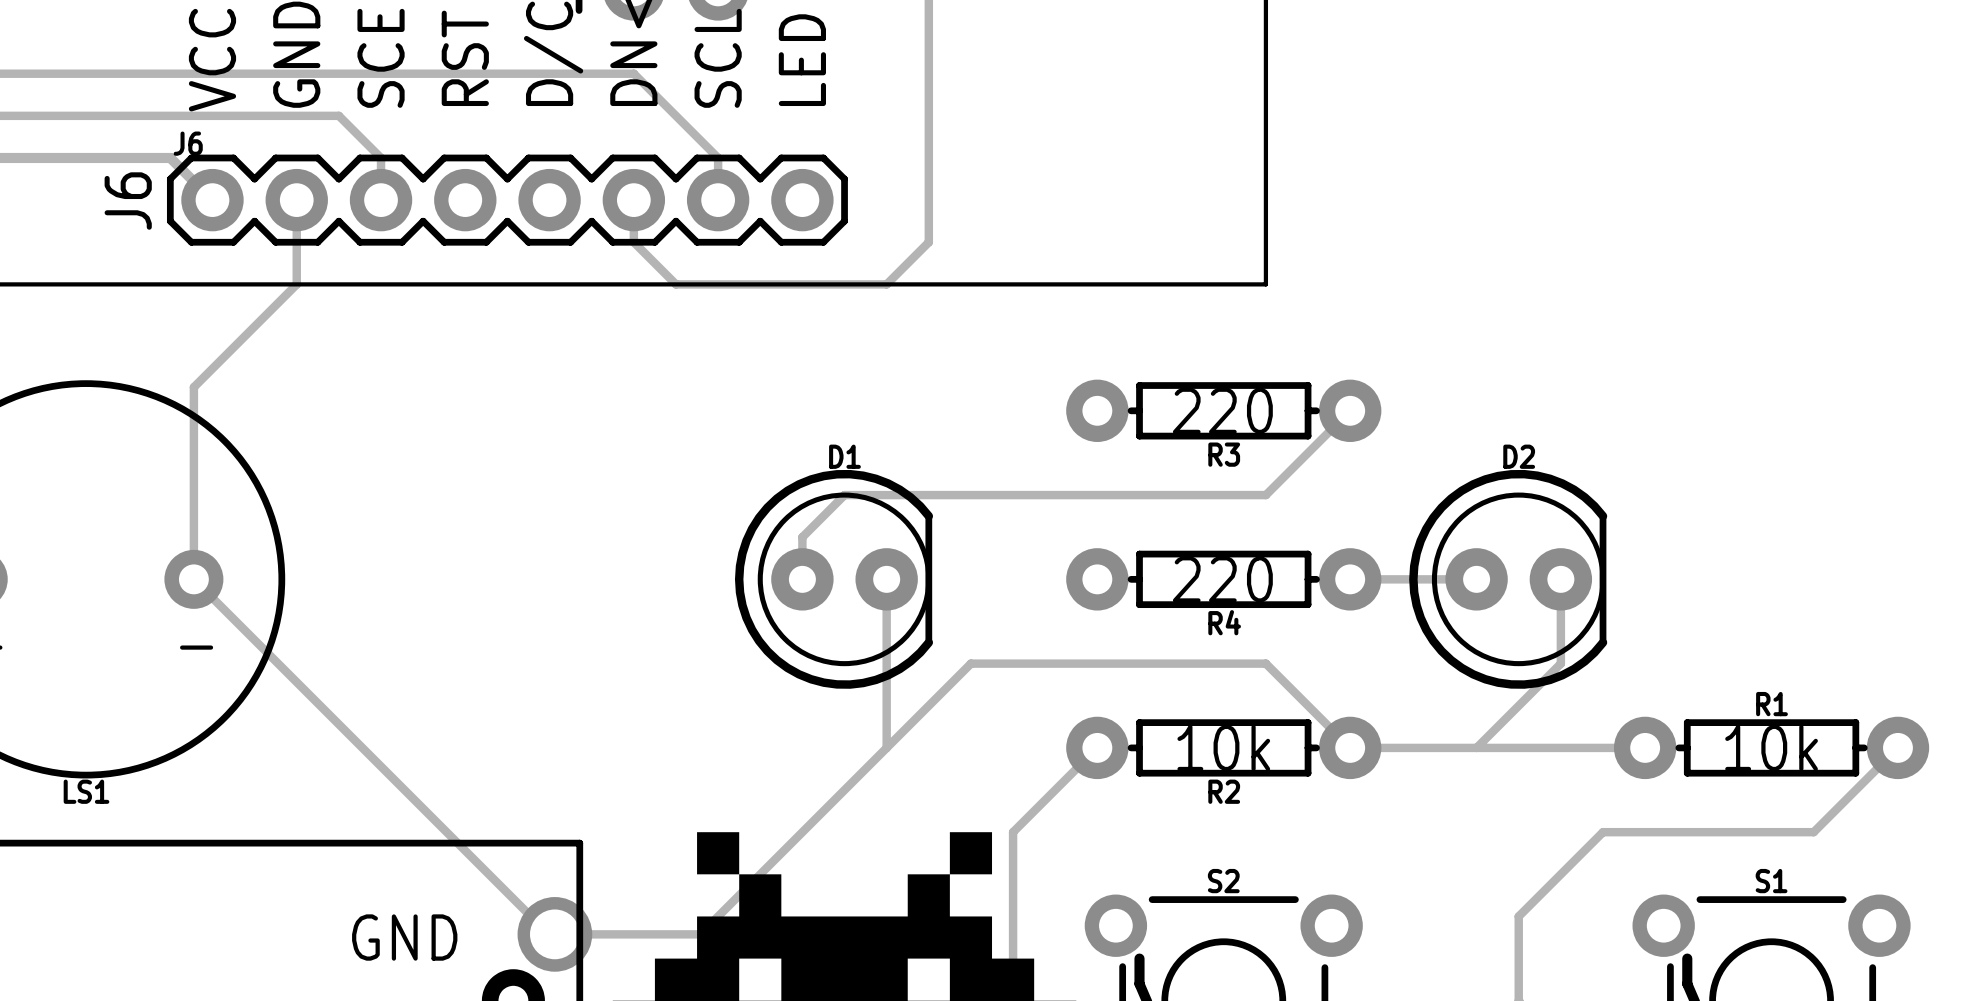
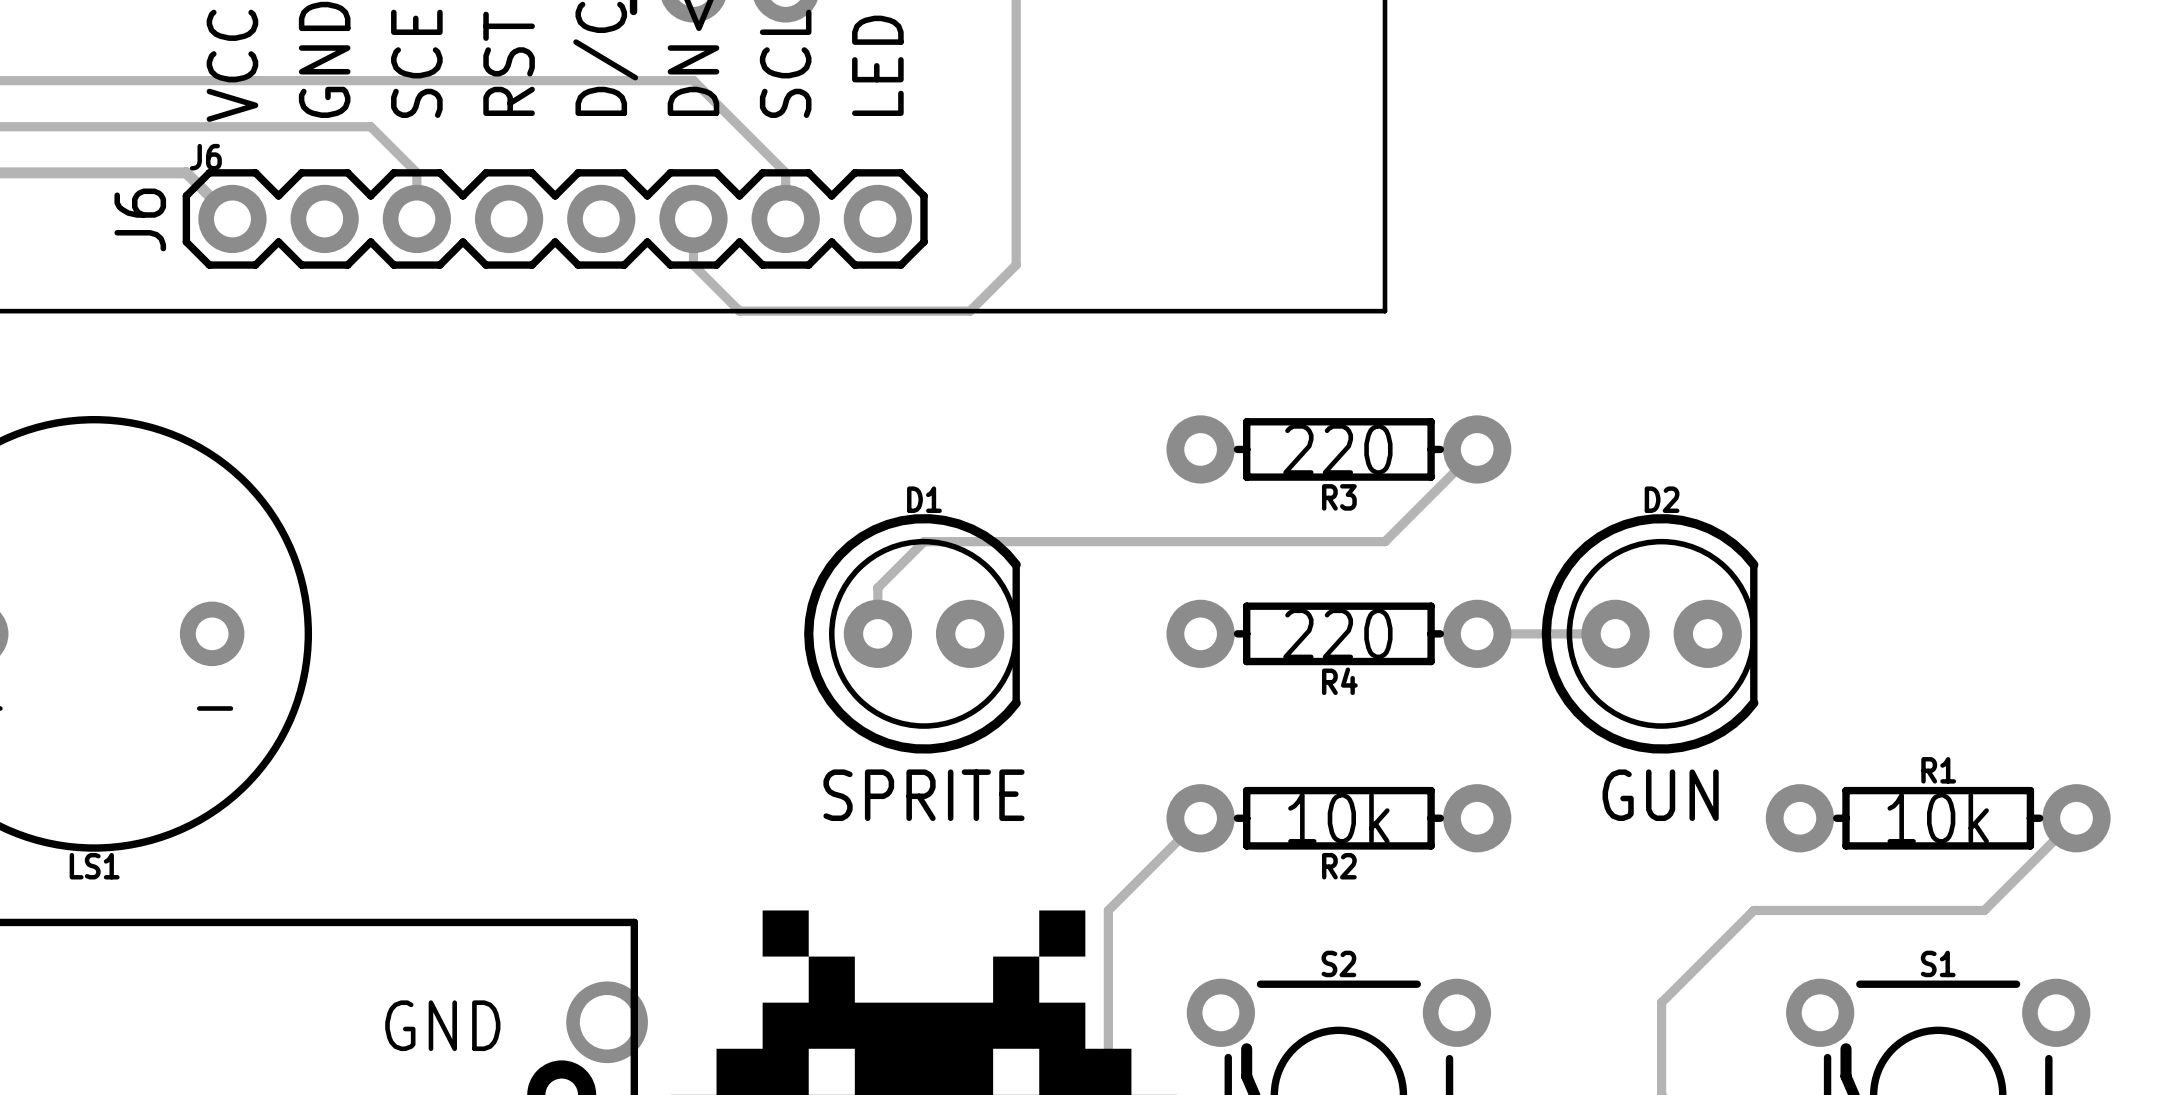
track: (296, 200) (296, 284) (193, 387) (193, 579) (548, 934) (700, 934) (970, 663) (1265, 663) (1350, 747) (1645, 747) -> none
track: (886, 579) (886, 747) -> none
track: (1560, 579) (1560, 663) (1476, 747) -> none
text: none -> SPRITE (923, 795)
text: none -> GUN (1660, 795)

